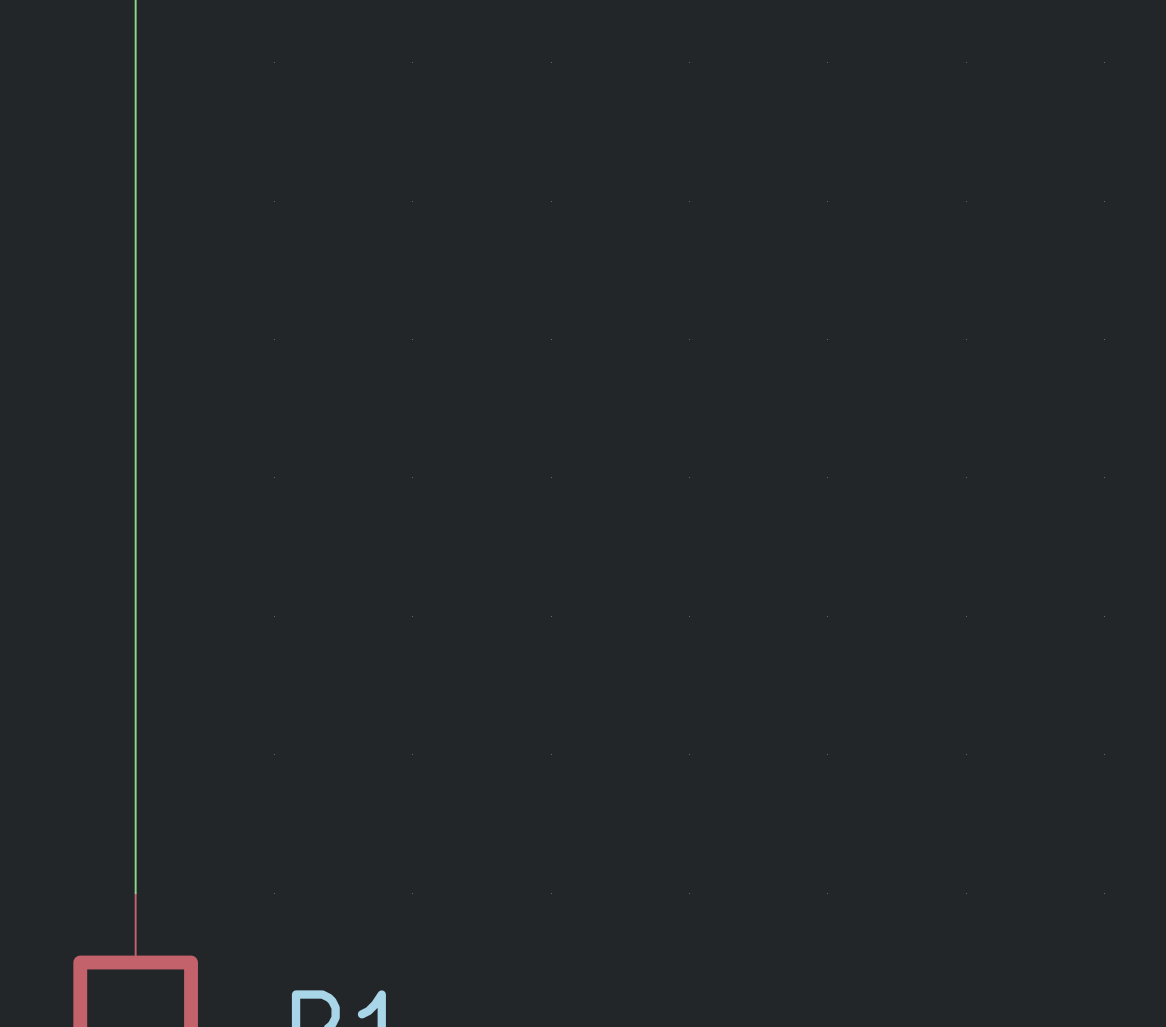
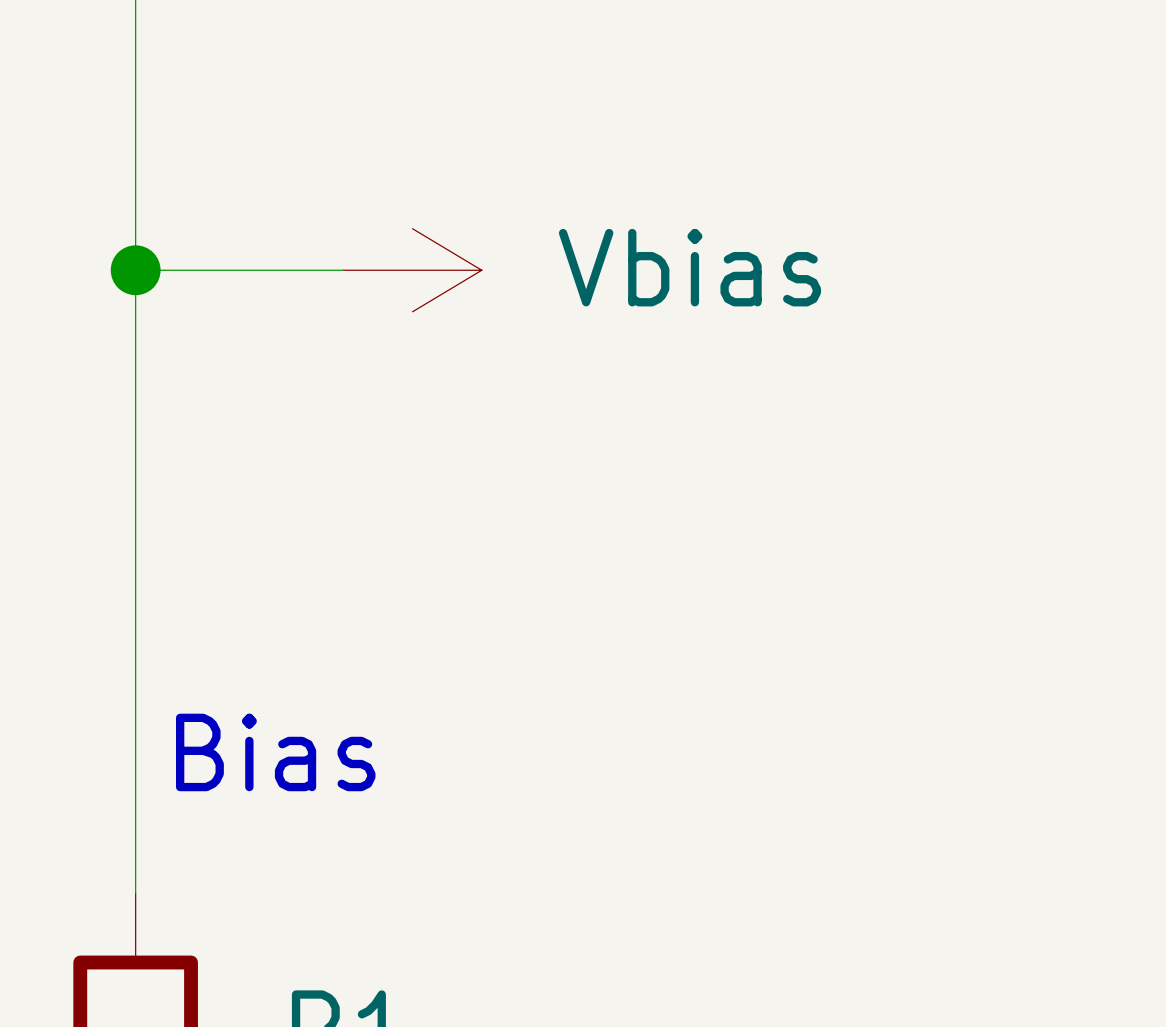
wire: none -> (135, 270) (343, 270)
junction: none -> (135, 270)
power symbol: none -> Vbias (412, 270)
text: none -> Bias (275, 752)

